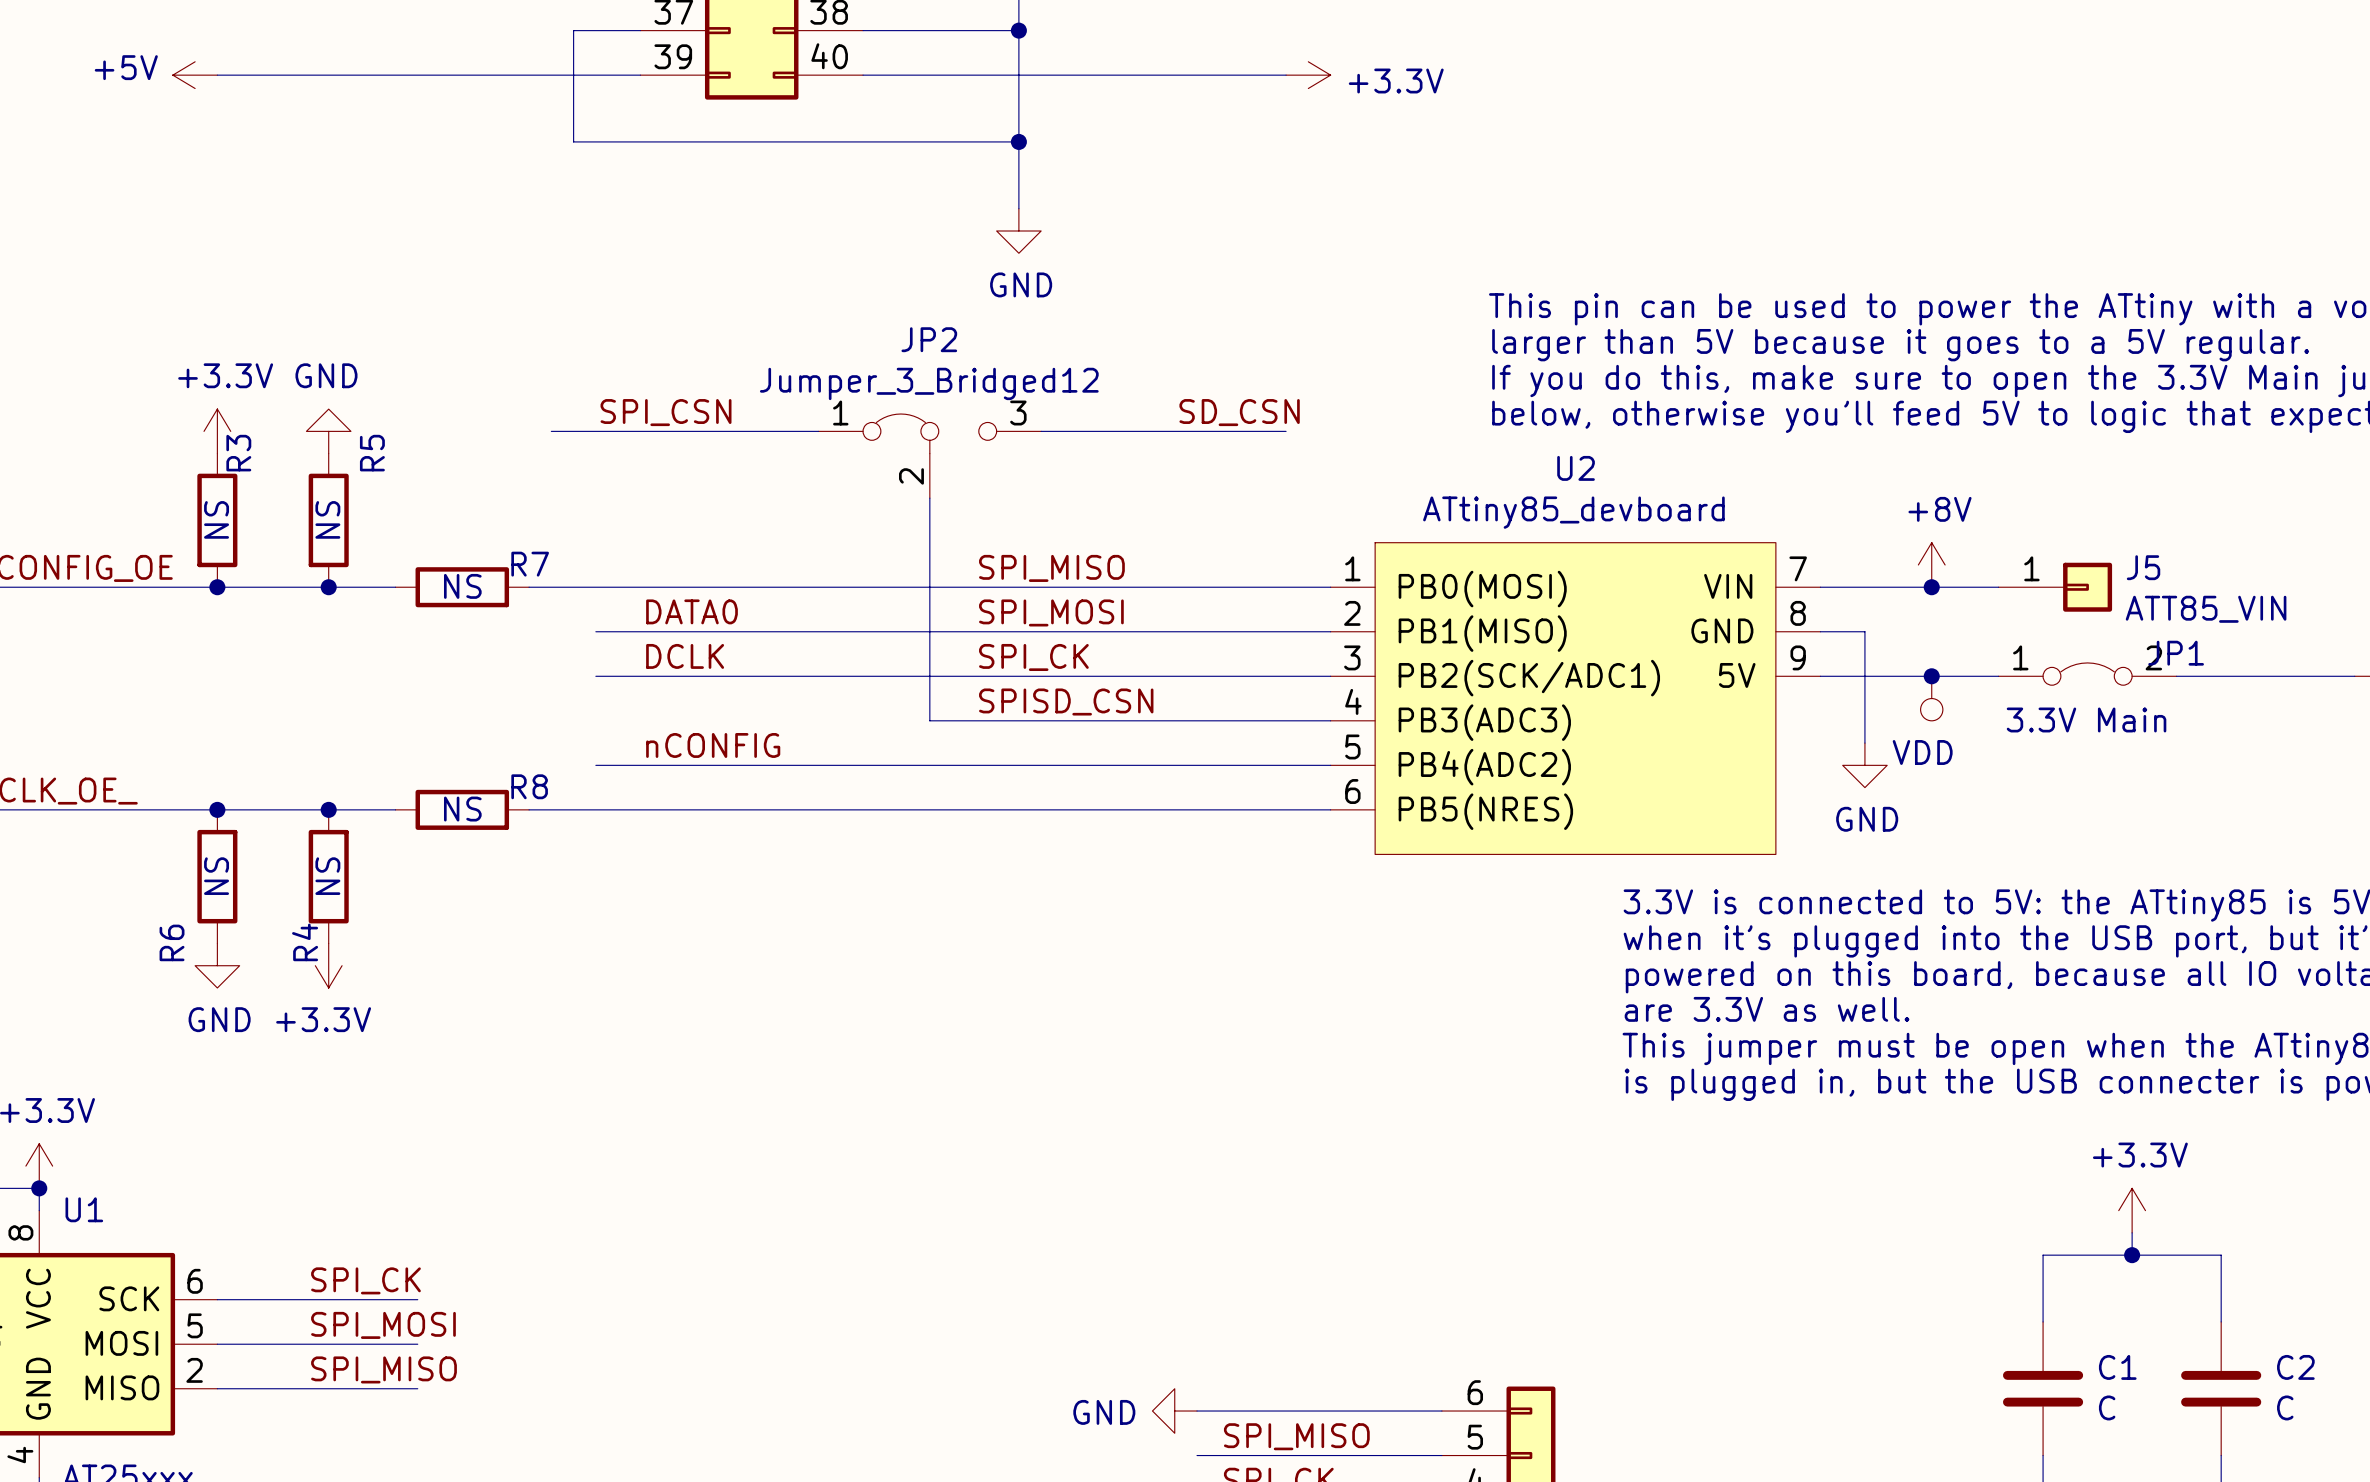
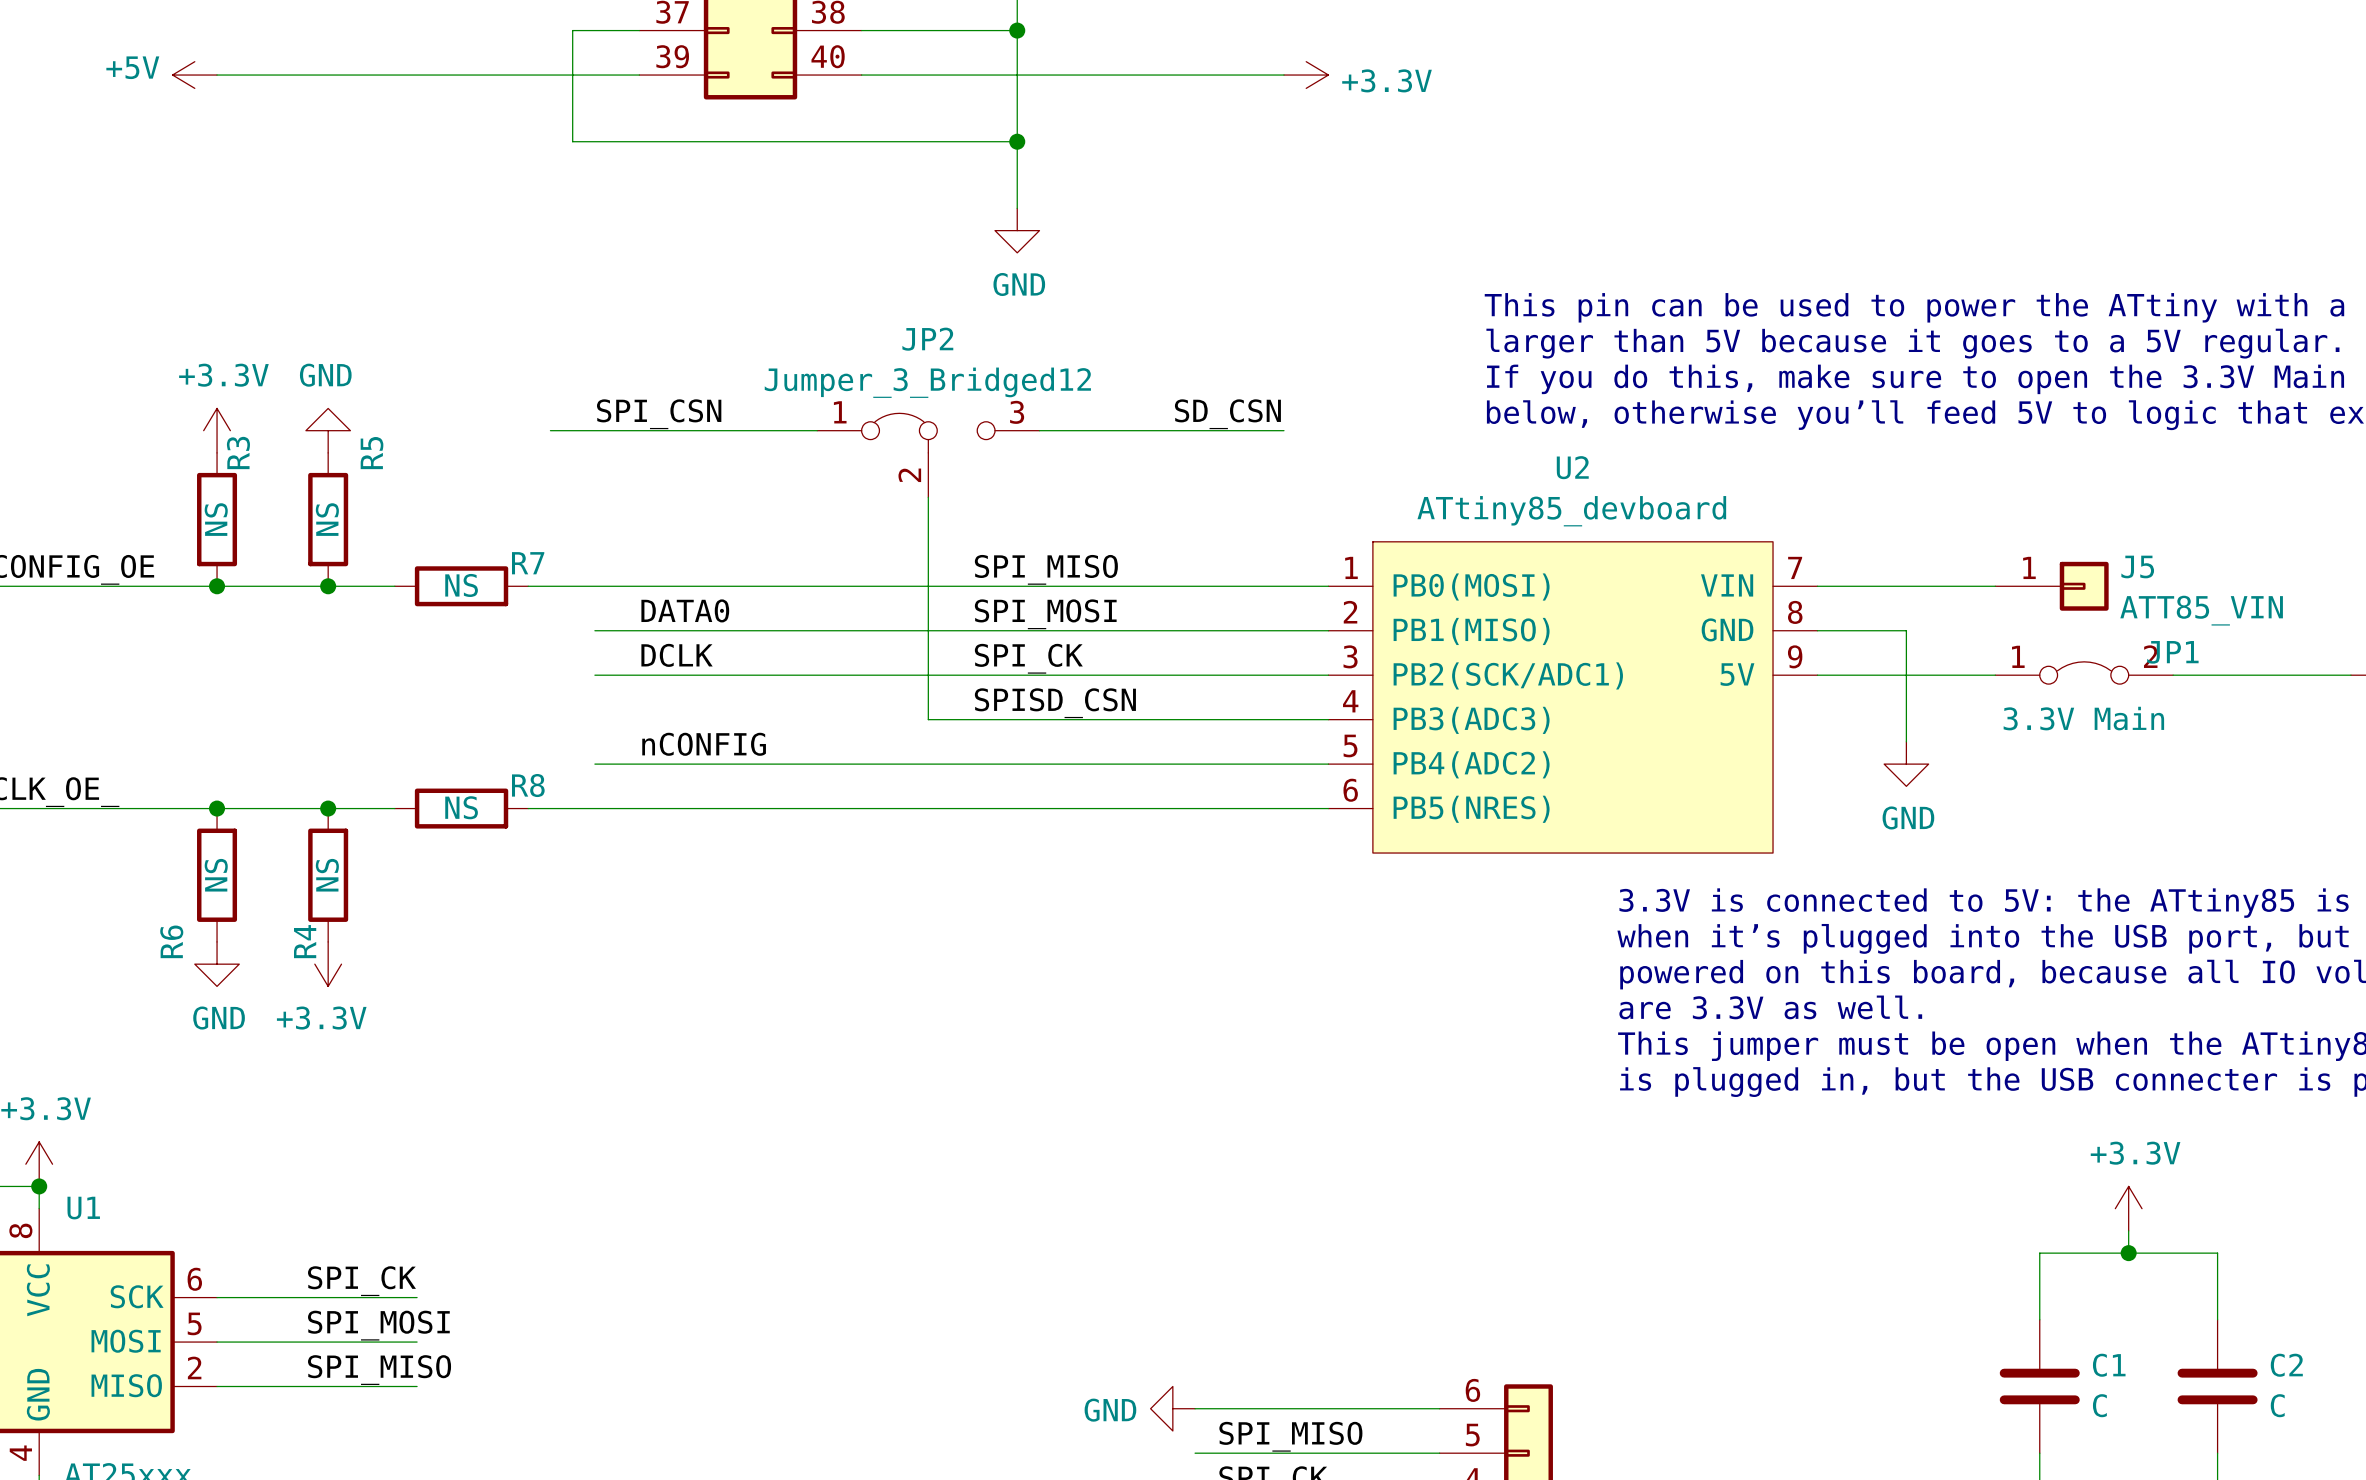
power symbol: +8V (1931, 564) -> none
junction: (1931, 587) -> none
wire: (1864, 631) (1864, 743) -> (1861, 630) (1906, 630) (1906, 741)
junction: (1931, 676) -> none
power symbol: VDD (1931, 698) -> none
power symbol position: GND (1864, 765) -> GND (1906, 764)

